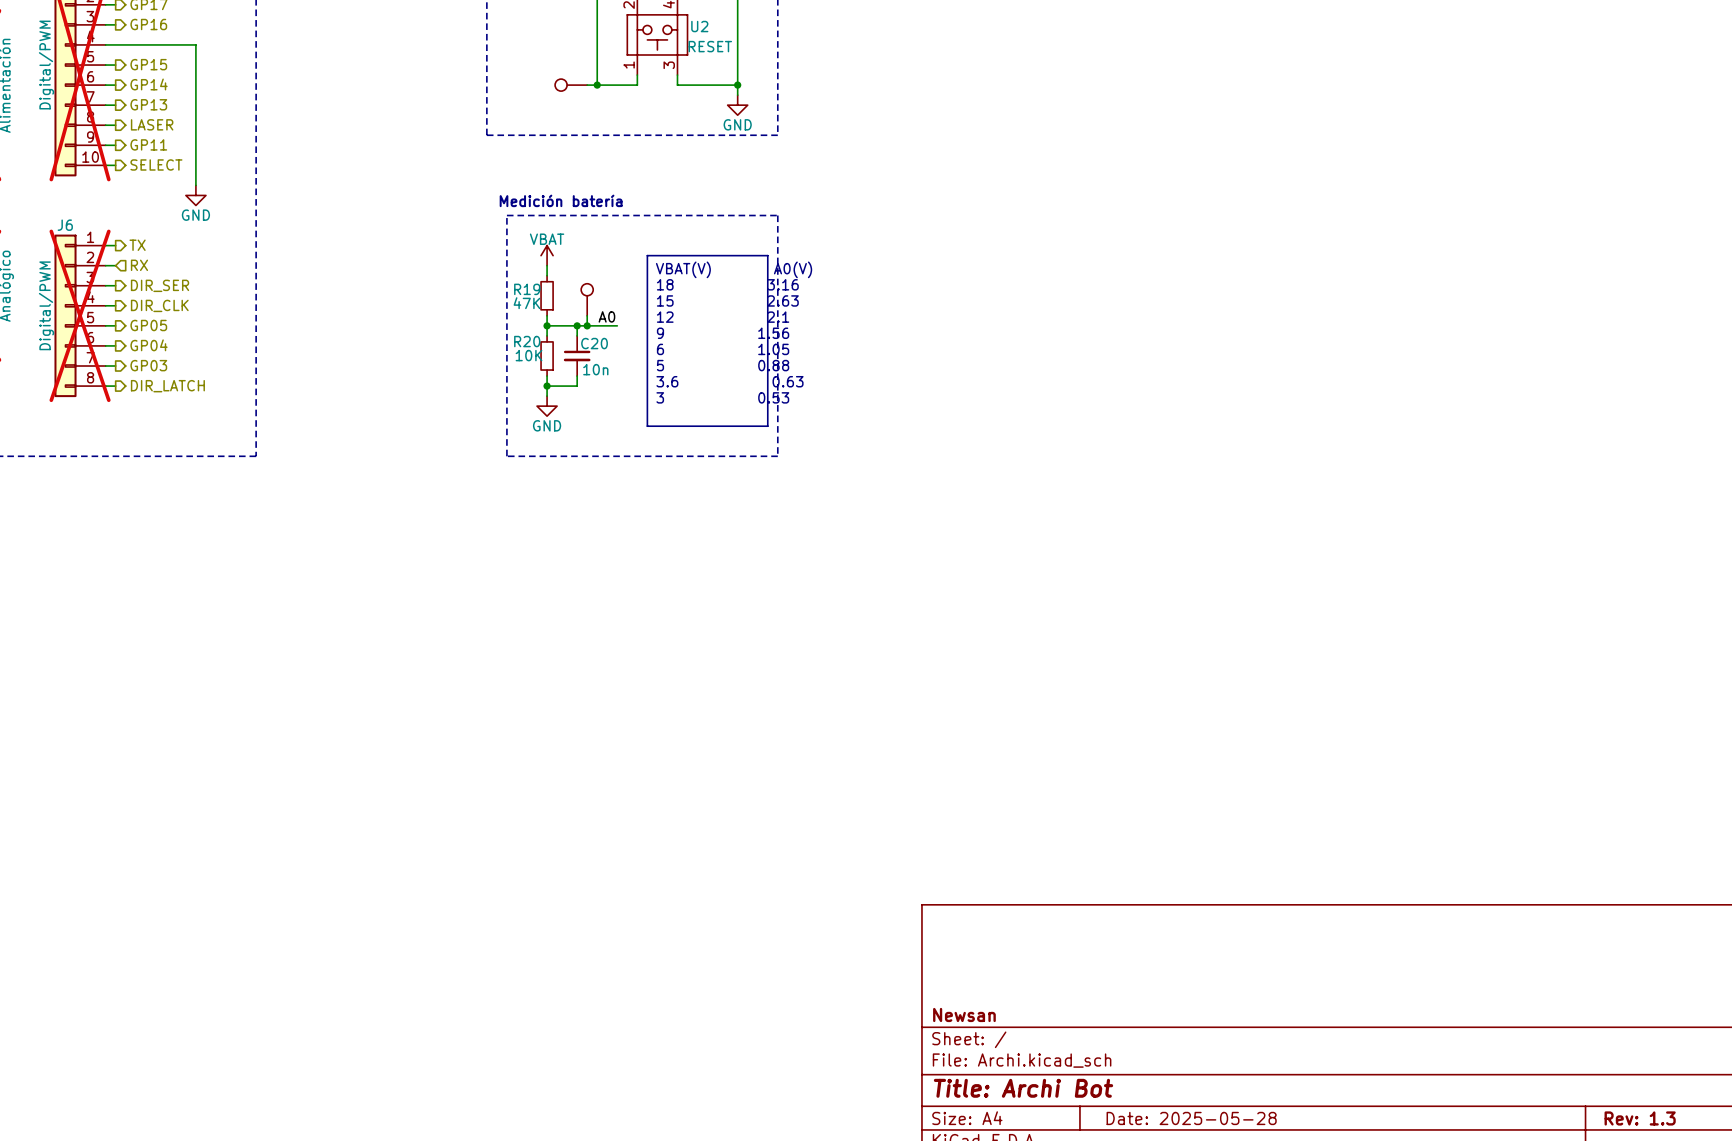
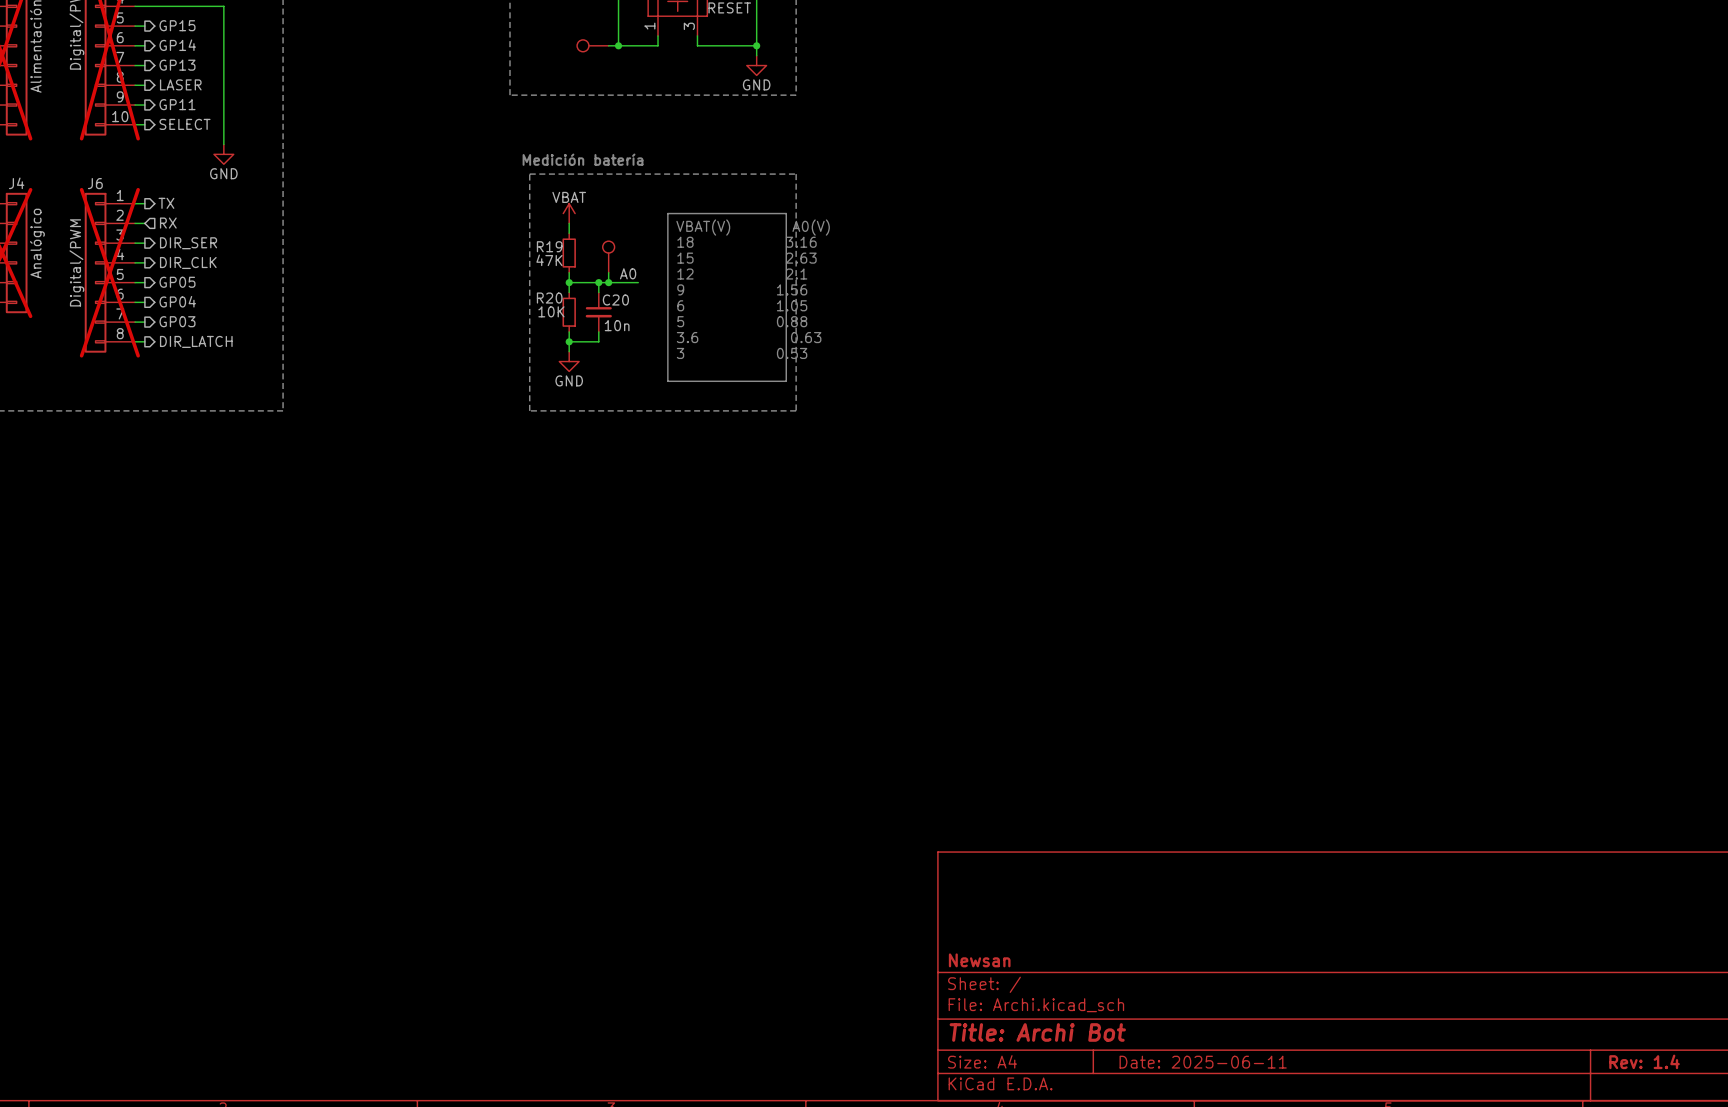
title block: Date: 2025-05-28 (1191, 1118) -> Date: 2025-06-11 (1203, 1062)
title block: Rev: 1.3 (1640, 1118) -> Rev: 1.4 (1644, 1061)

